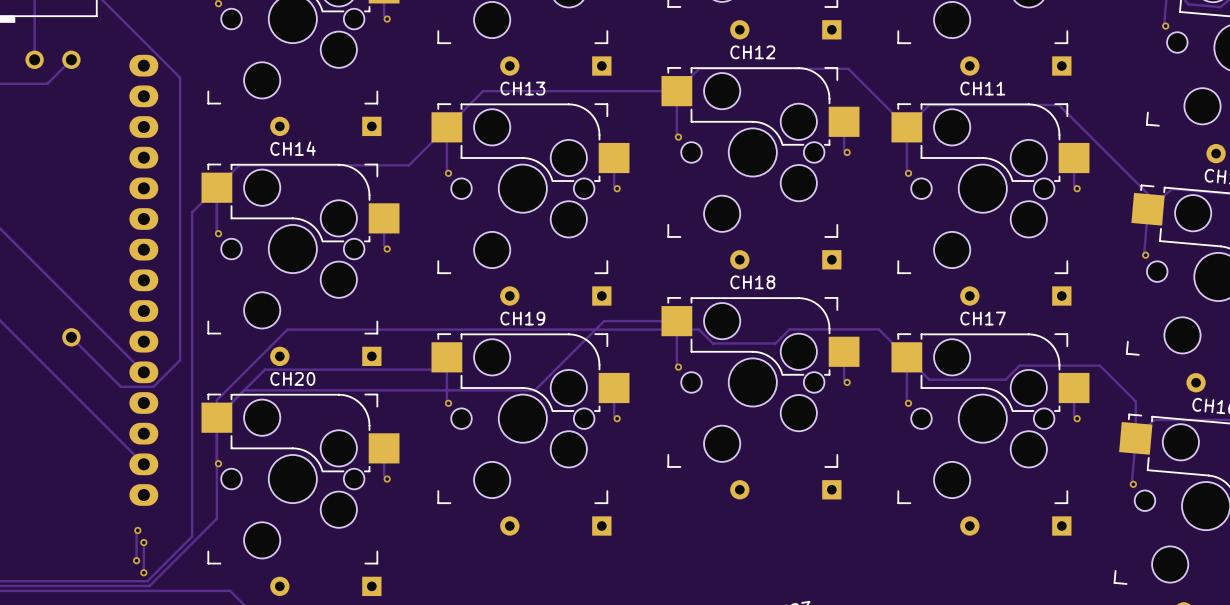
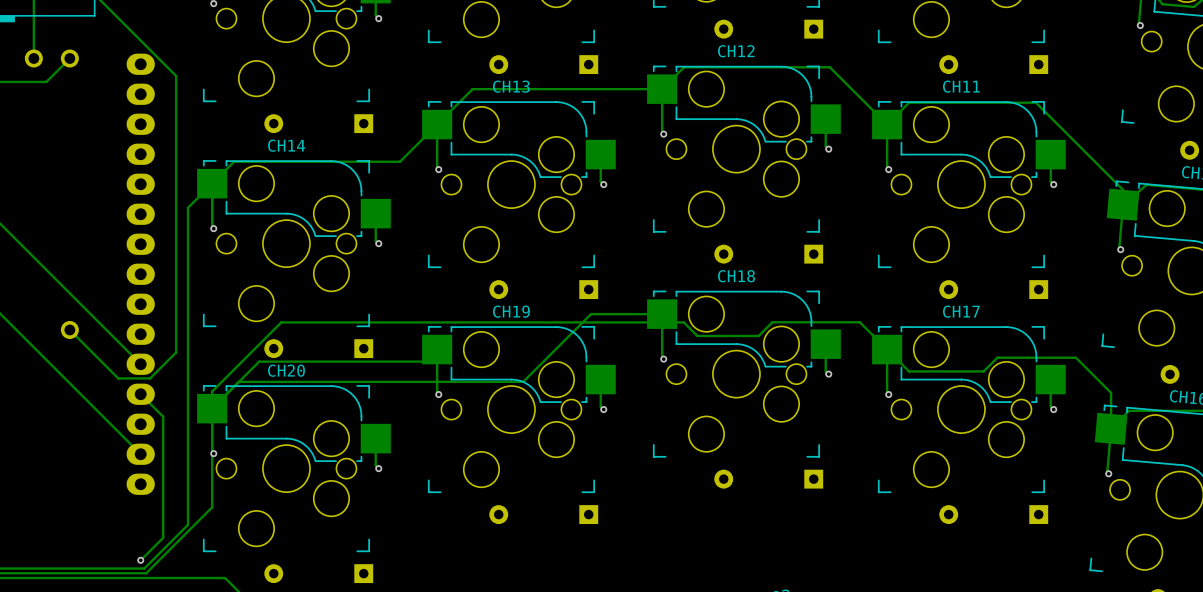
track: (137, 530) (136, 560) -> none
via: (137, 530) -> none
track: (143, 542) (143, 572) -> (140, 394) (163, 416) (163, 537) (140, 560)
via: (143, 542) -> none
via: (136, 560) -> none

